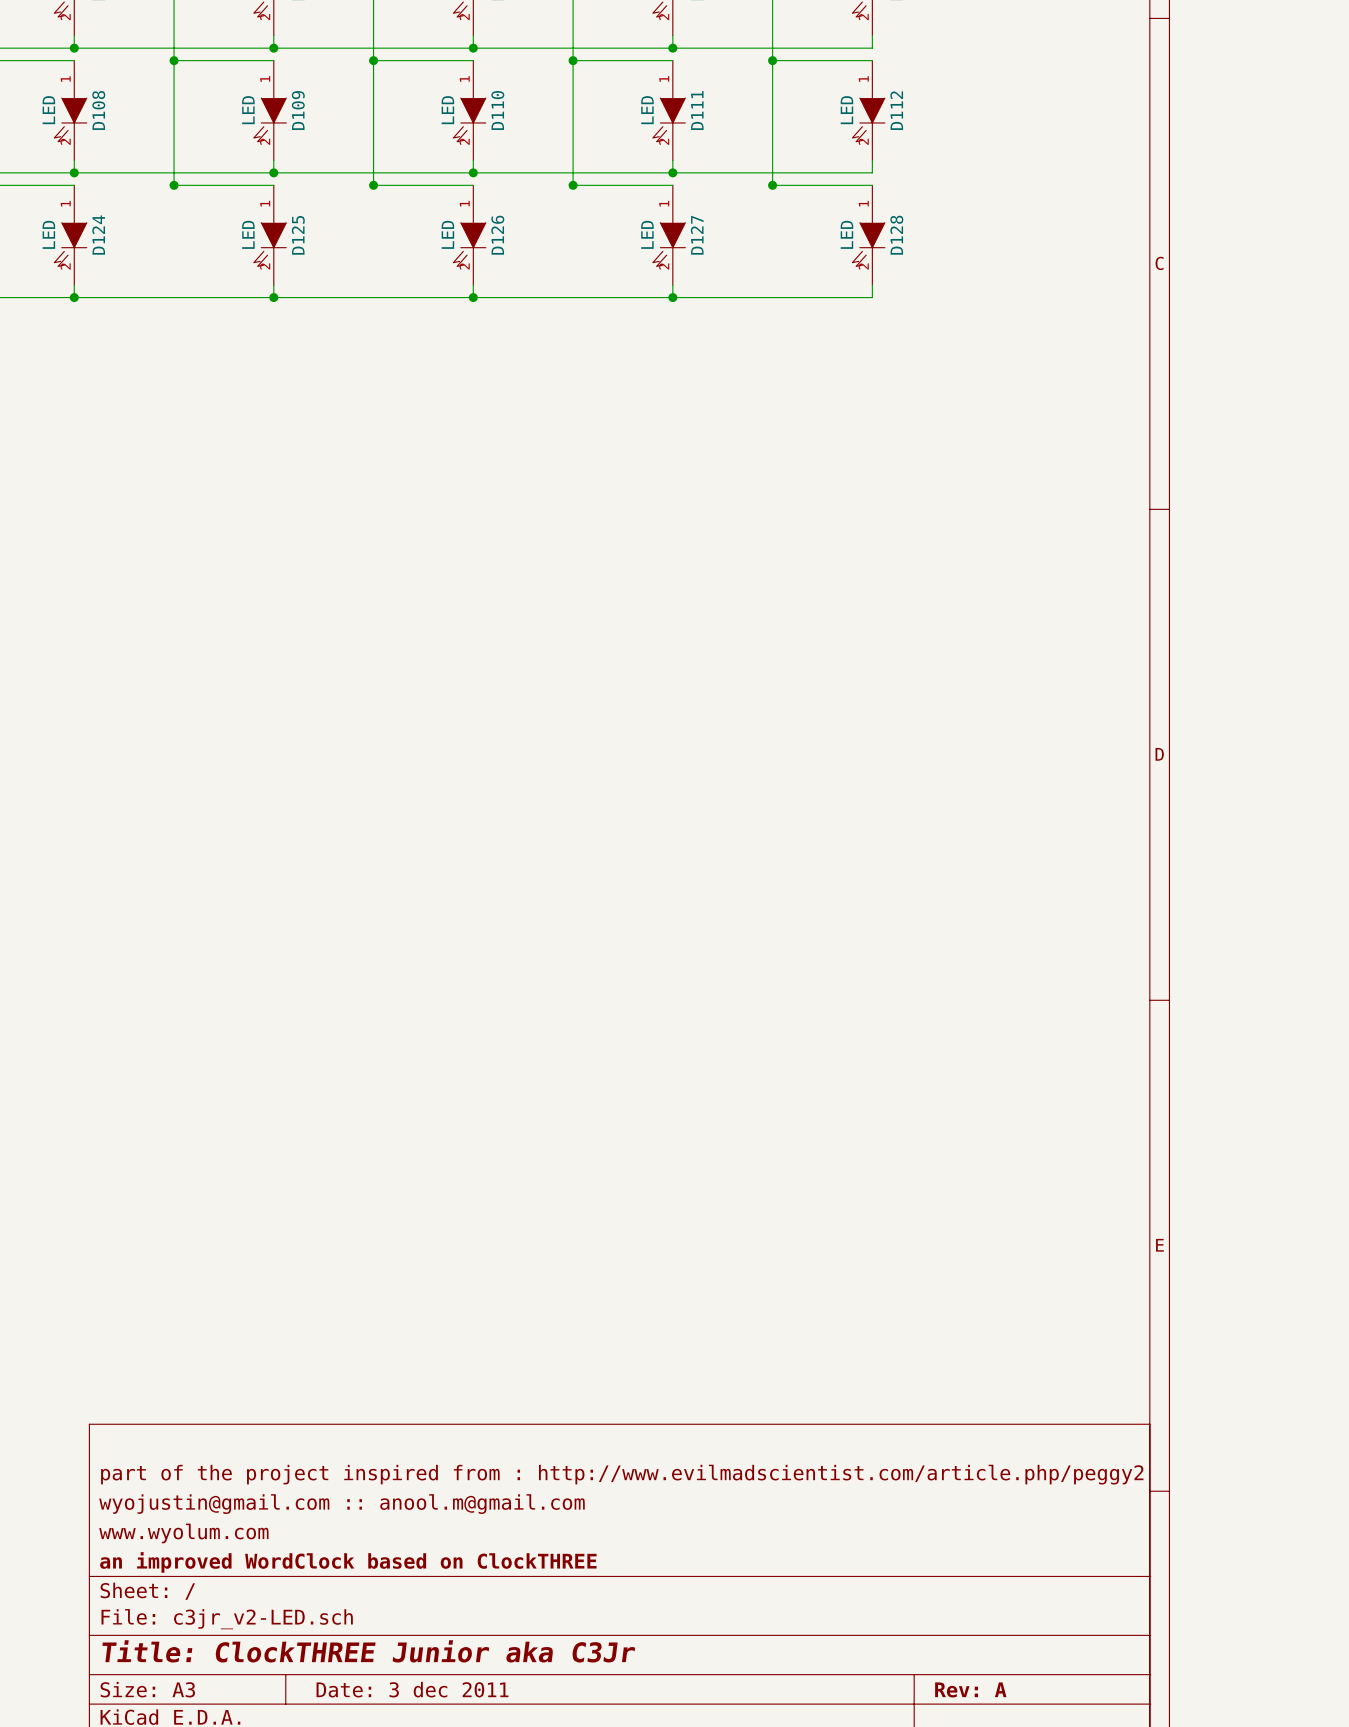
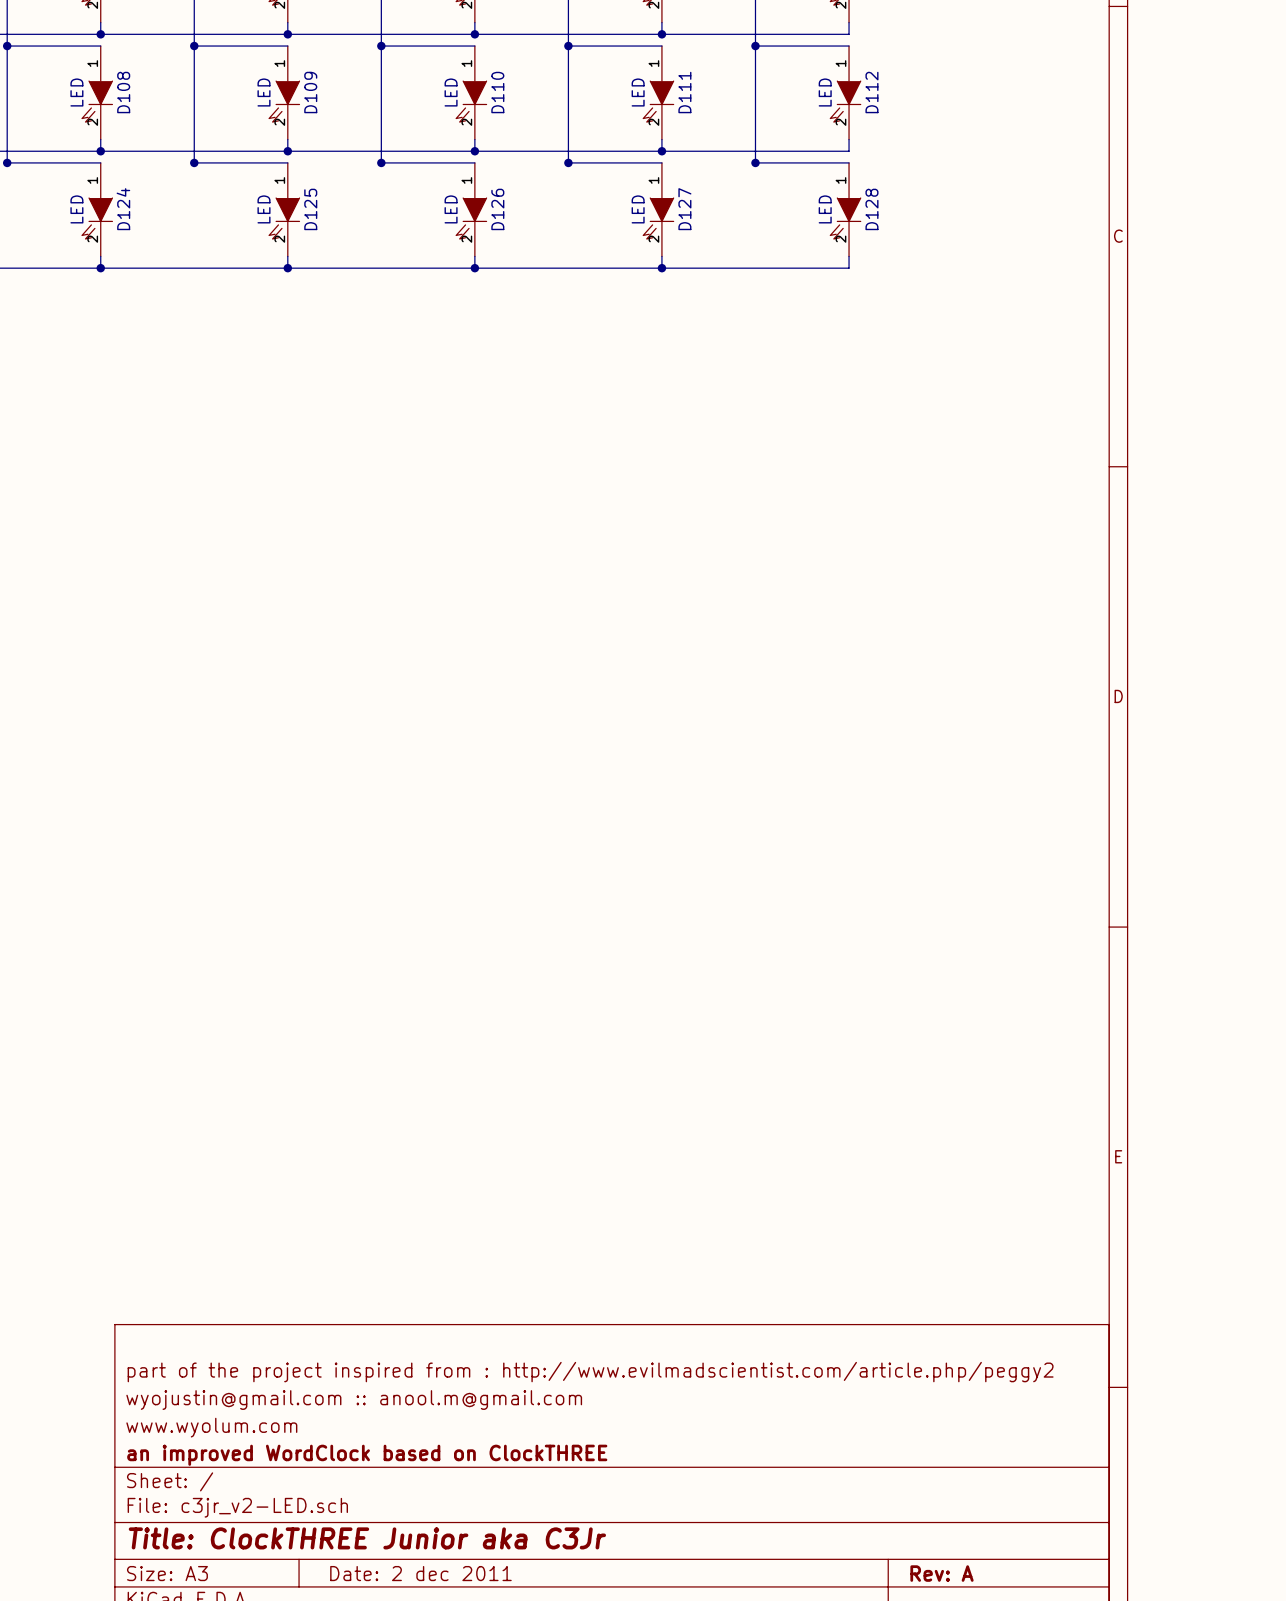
title block: Date: 3 dec 2011 (412, 1689) -> Date: 2 dec 2011 (420, 1573)

